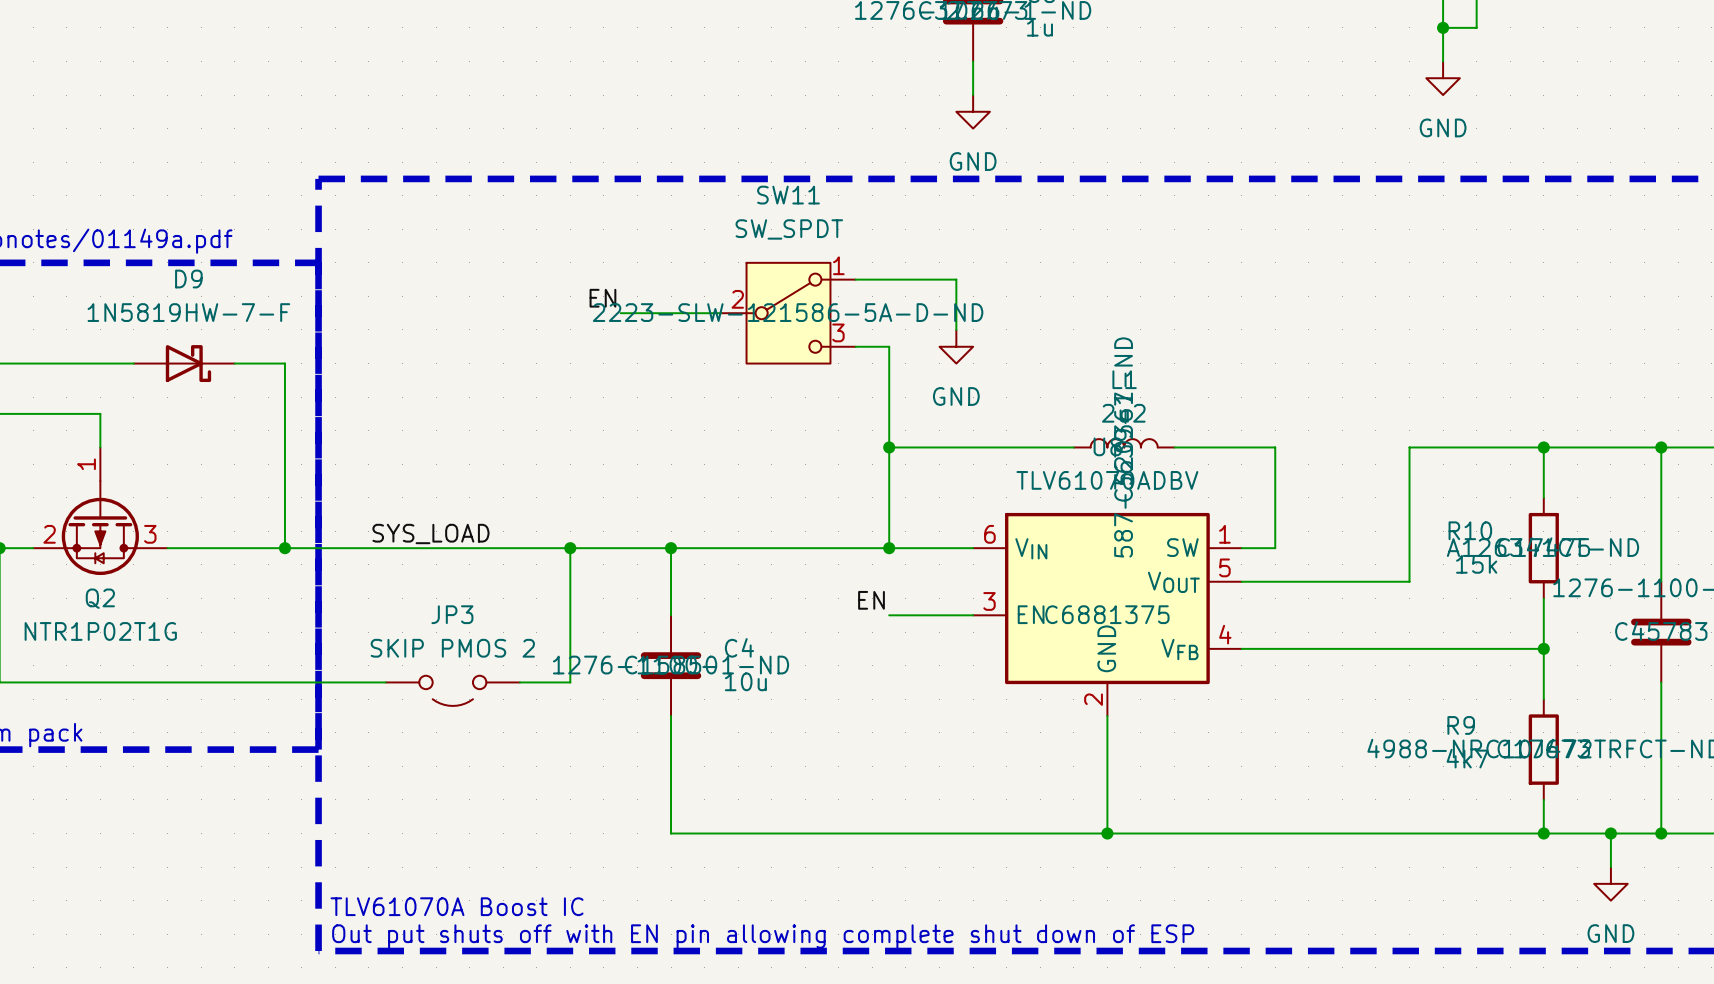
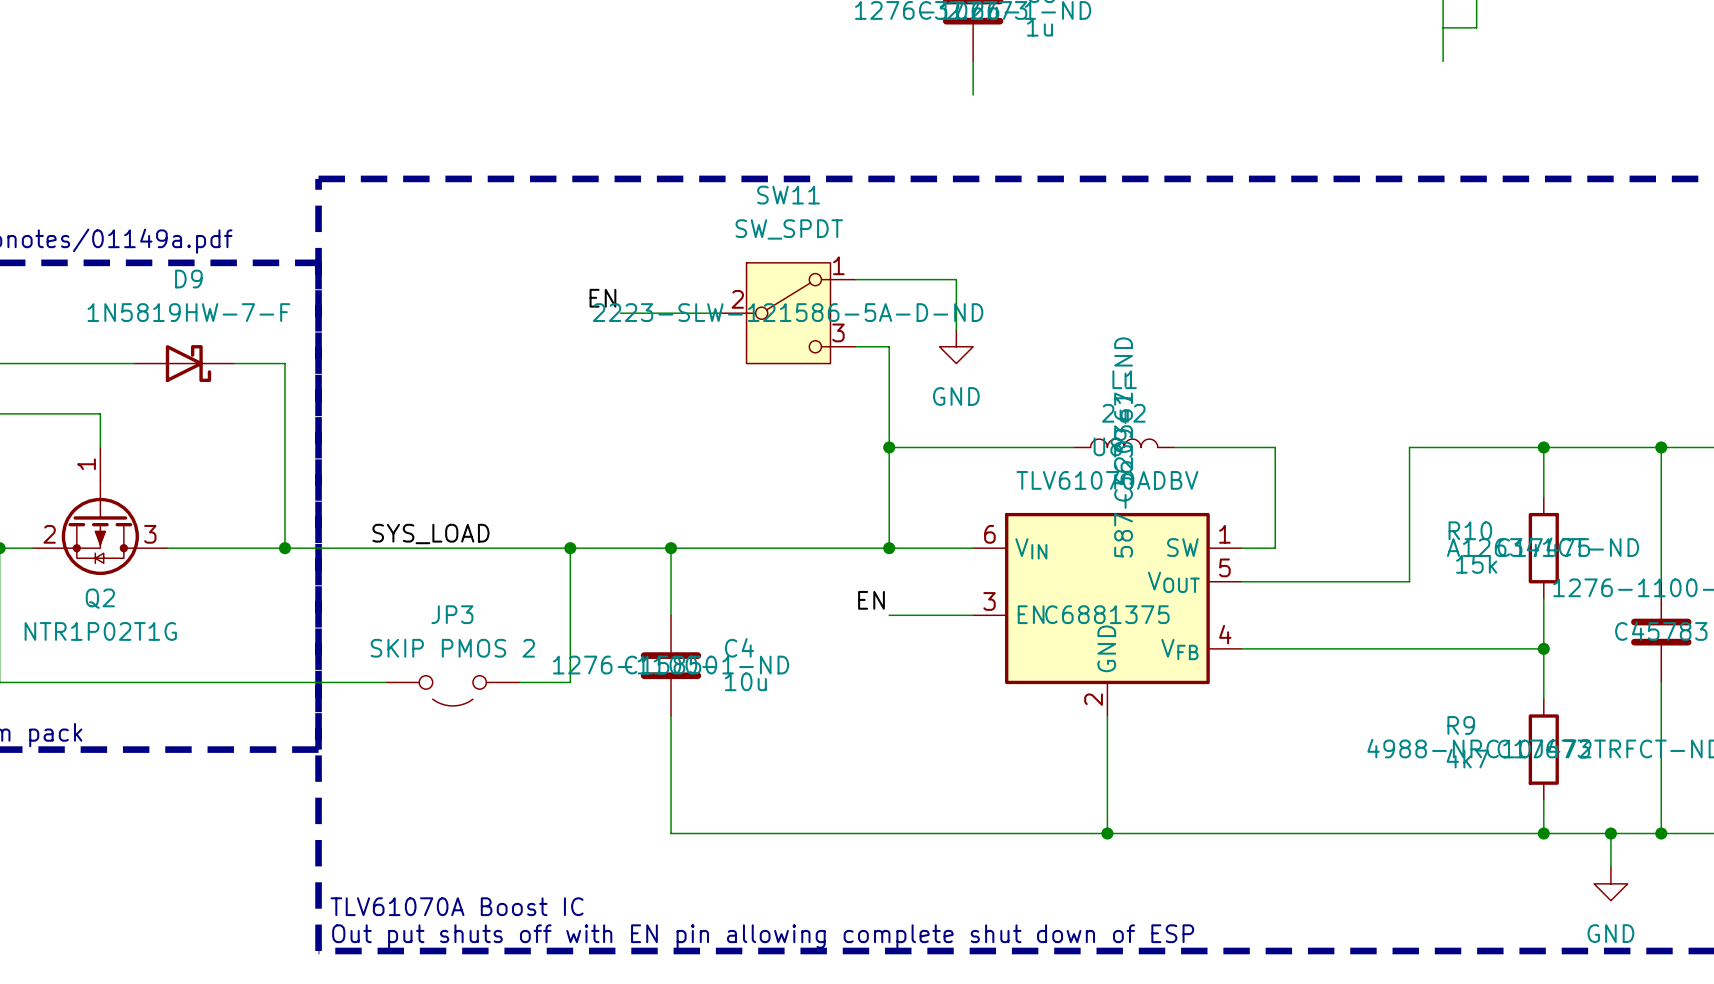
junction: (1443, 27) -> none
power symbol: GND (1443, 78) -> none
power symbol: GND (973, 111) -> none

